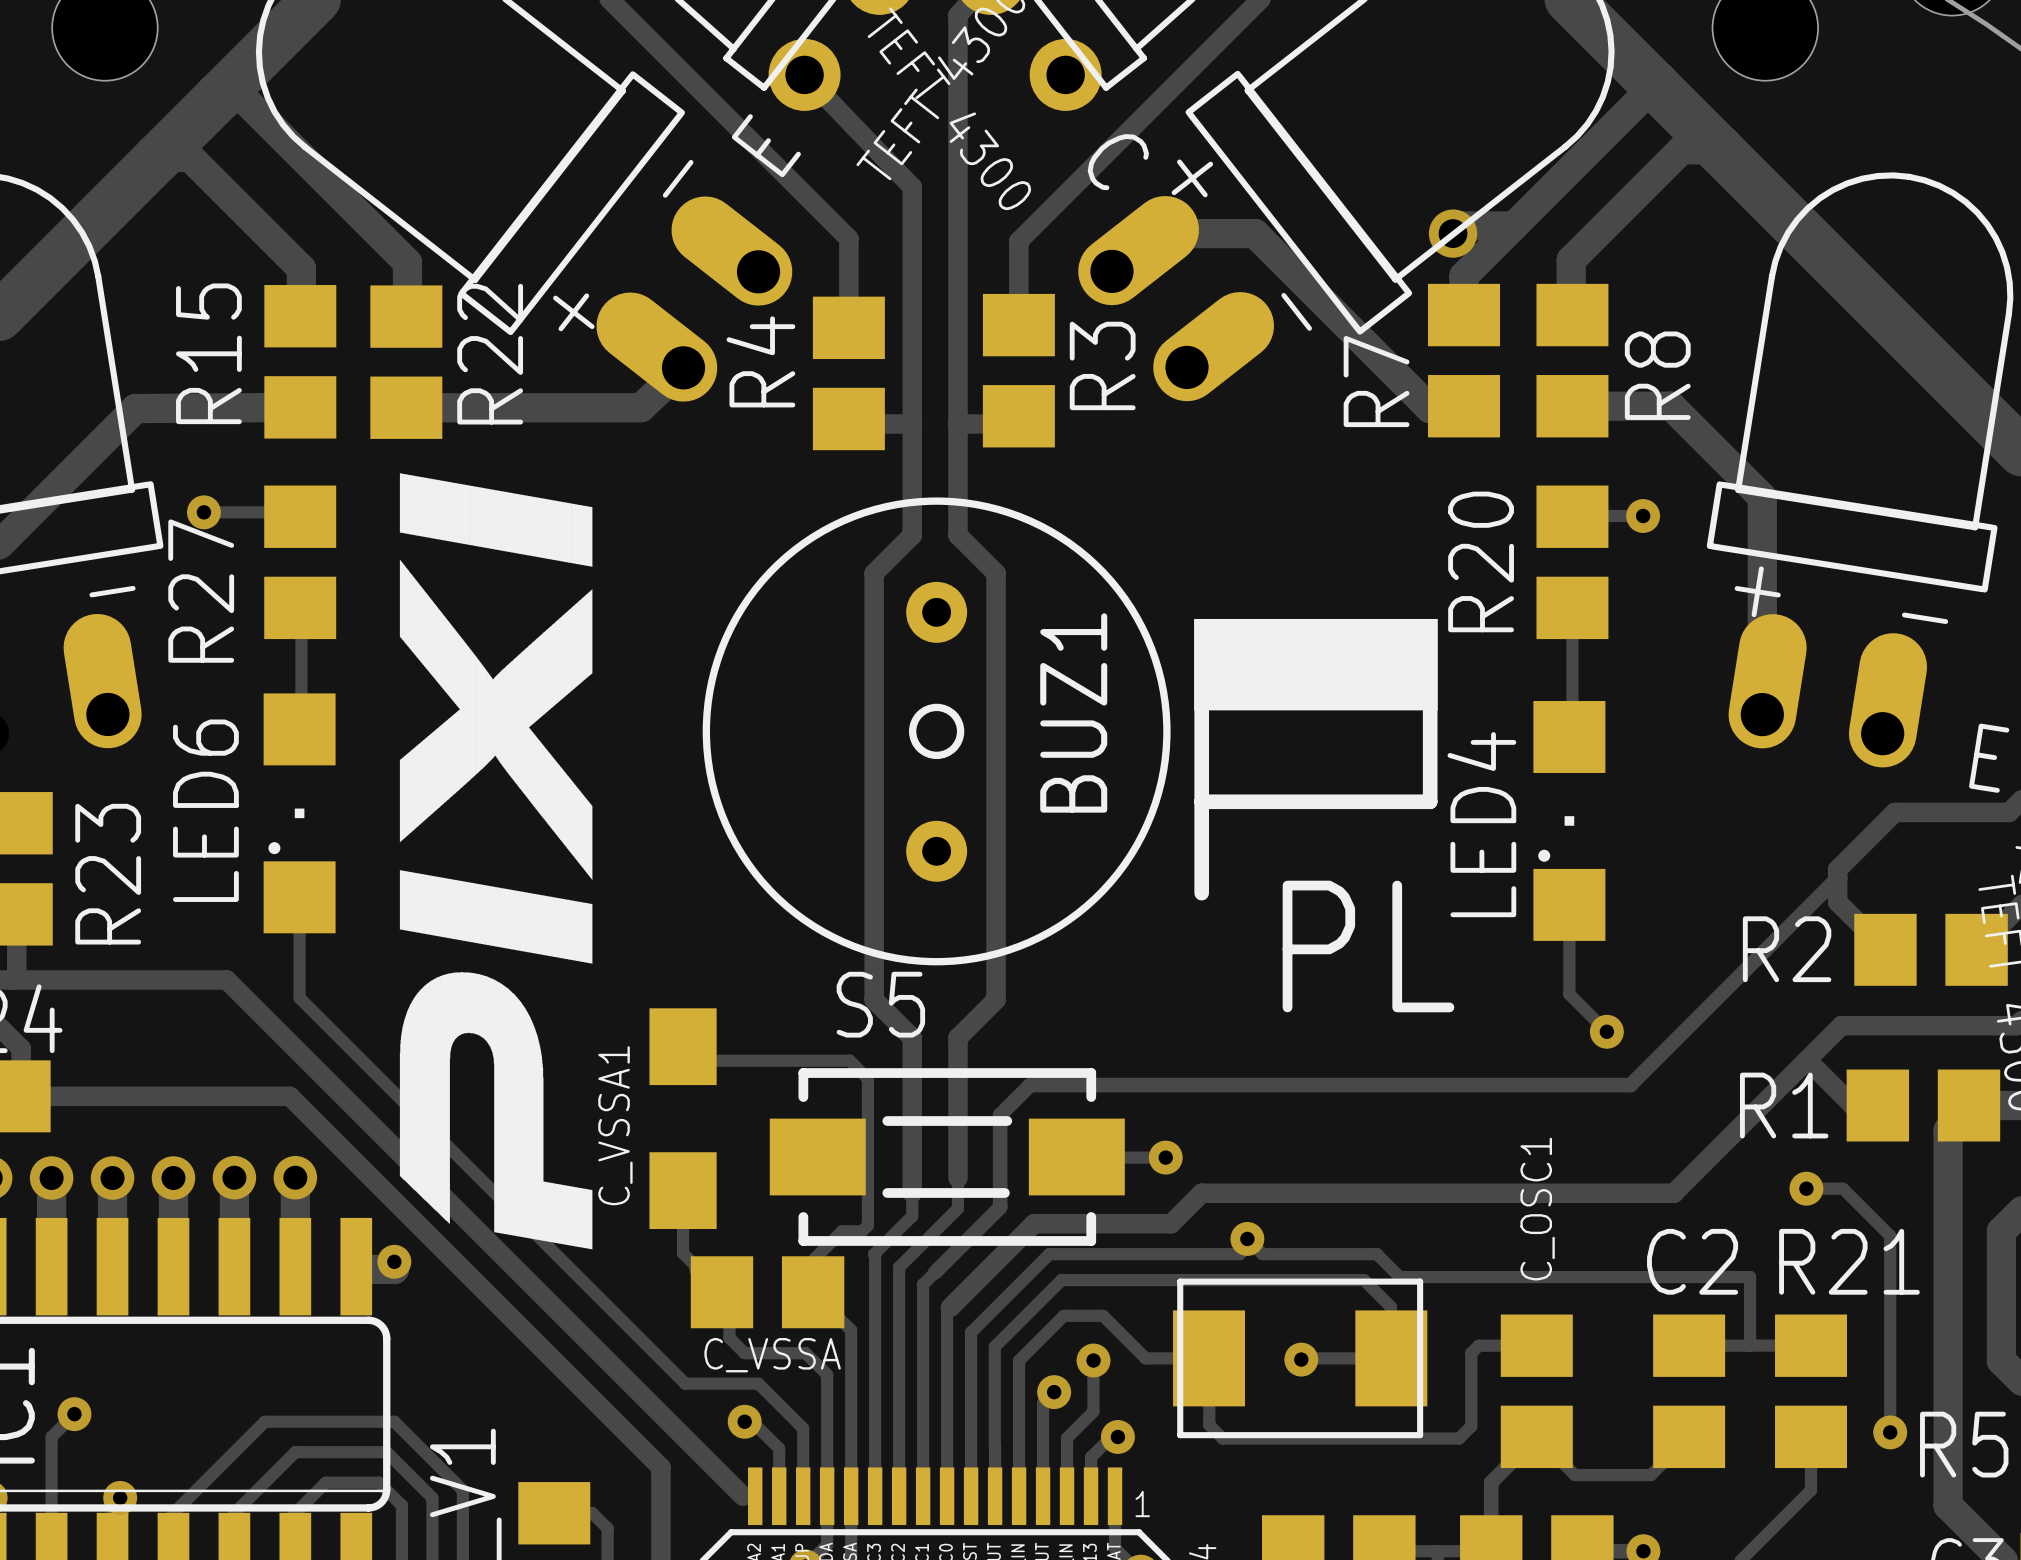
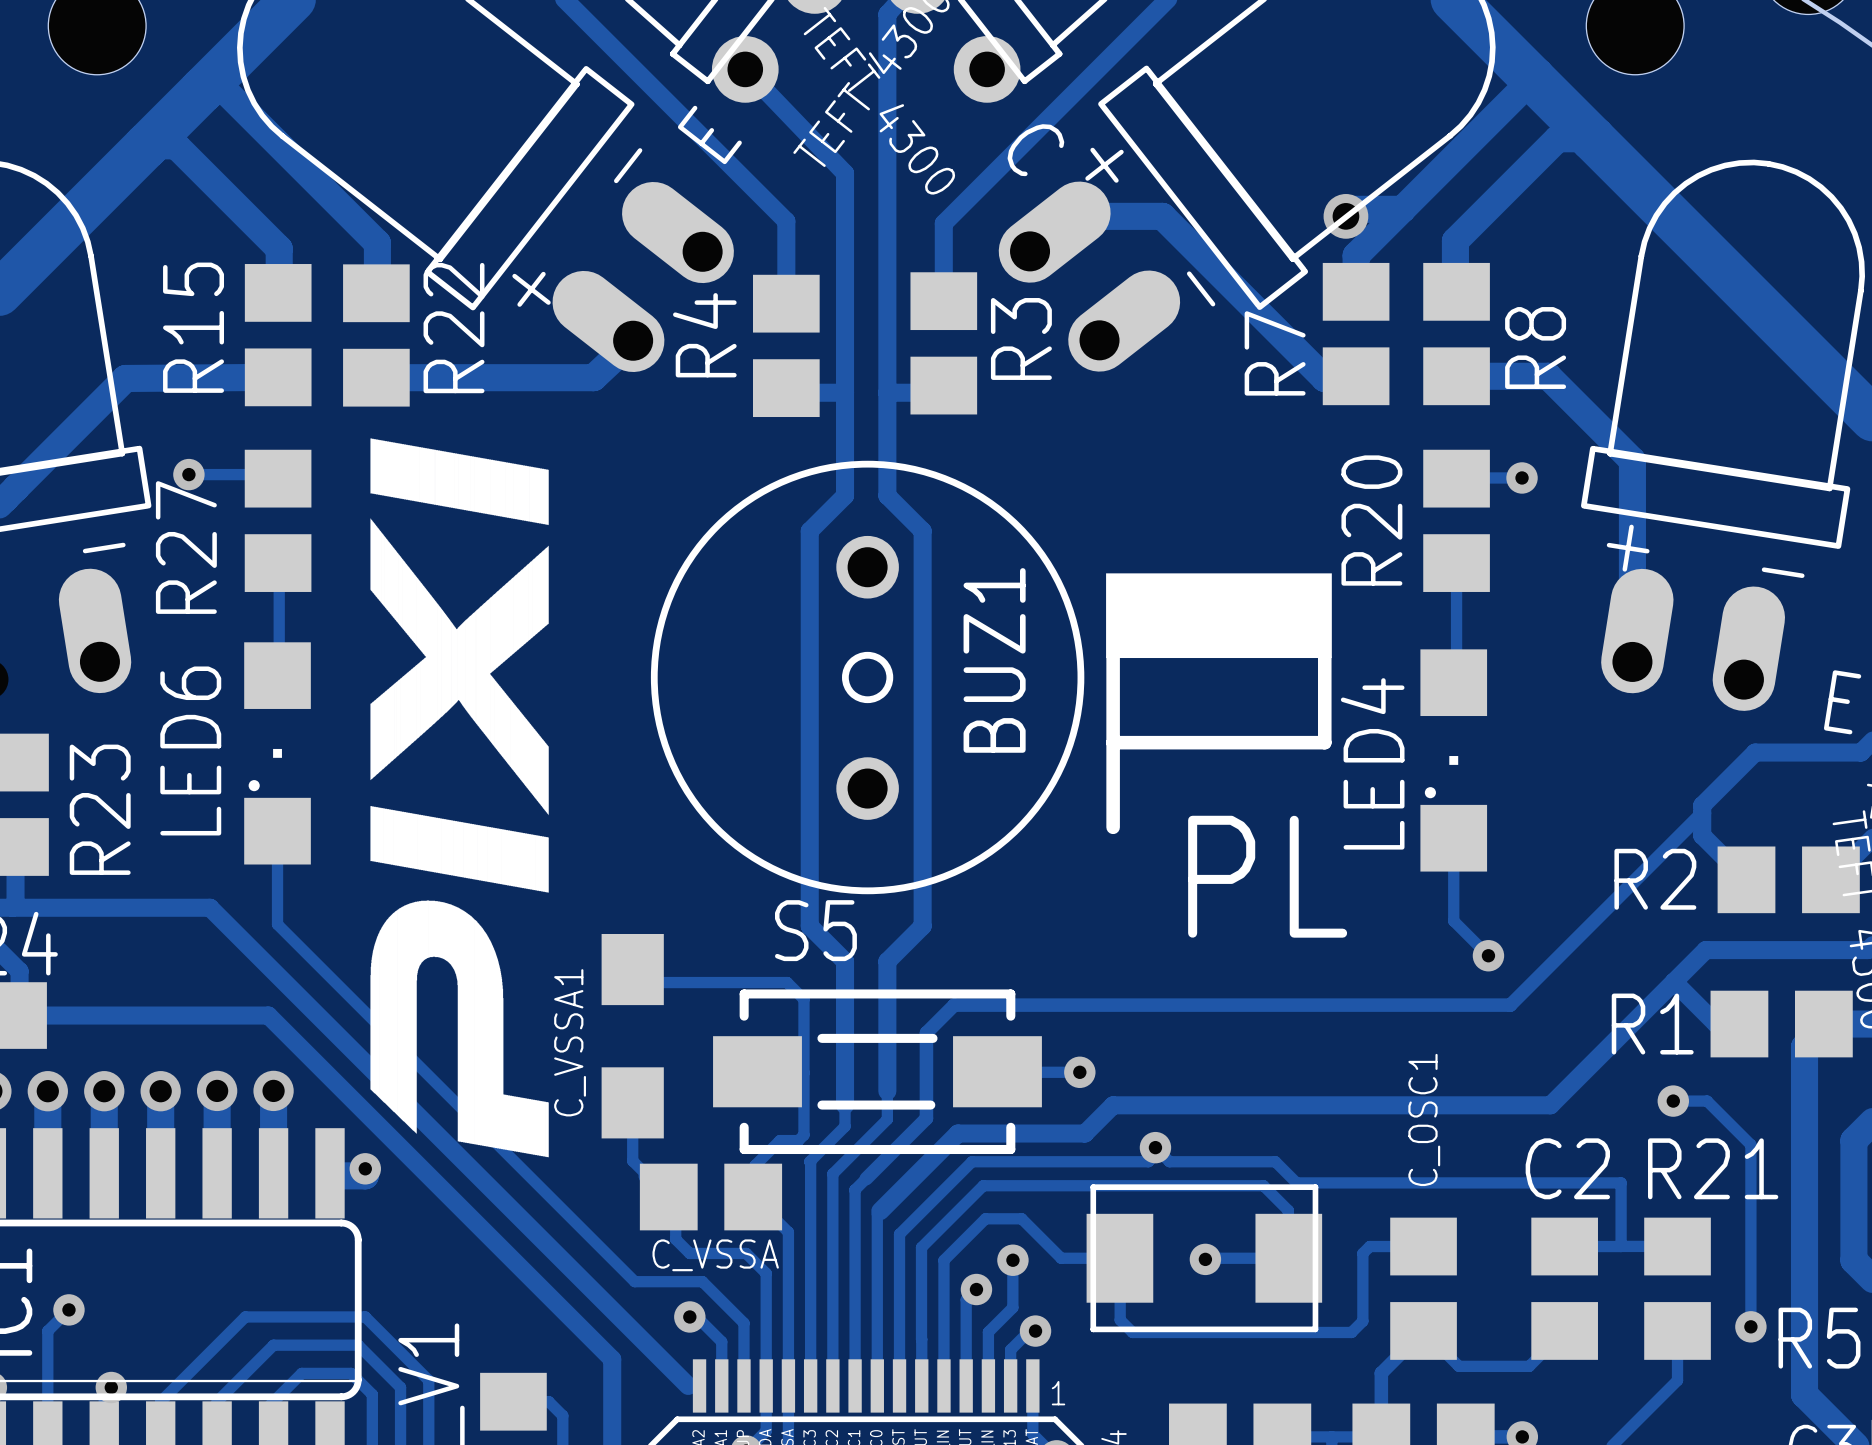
BUZ1 footprint: [702, 497, 1171, 966] -> [650, 460, 1085, 895]

